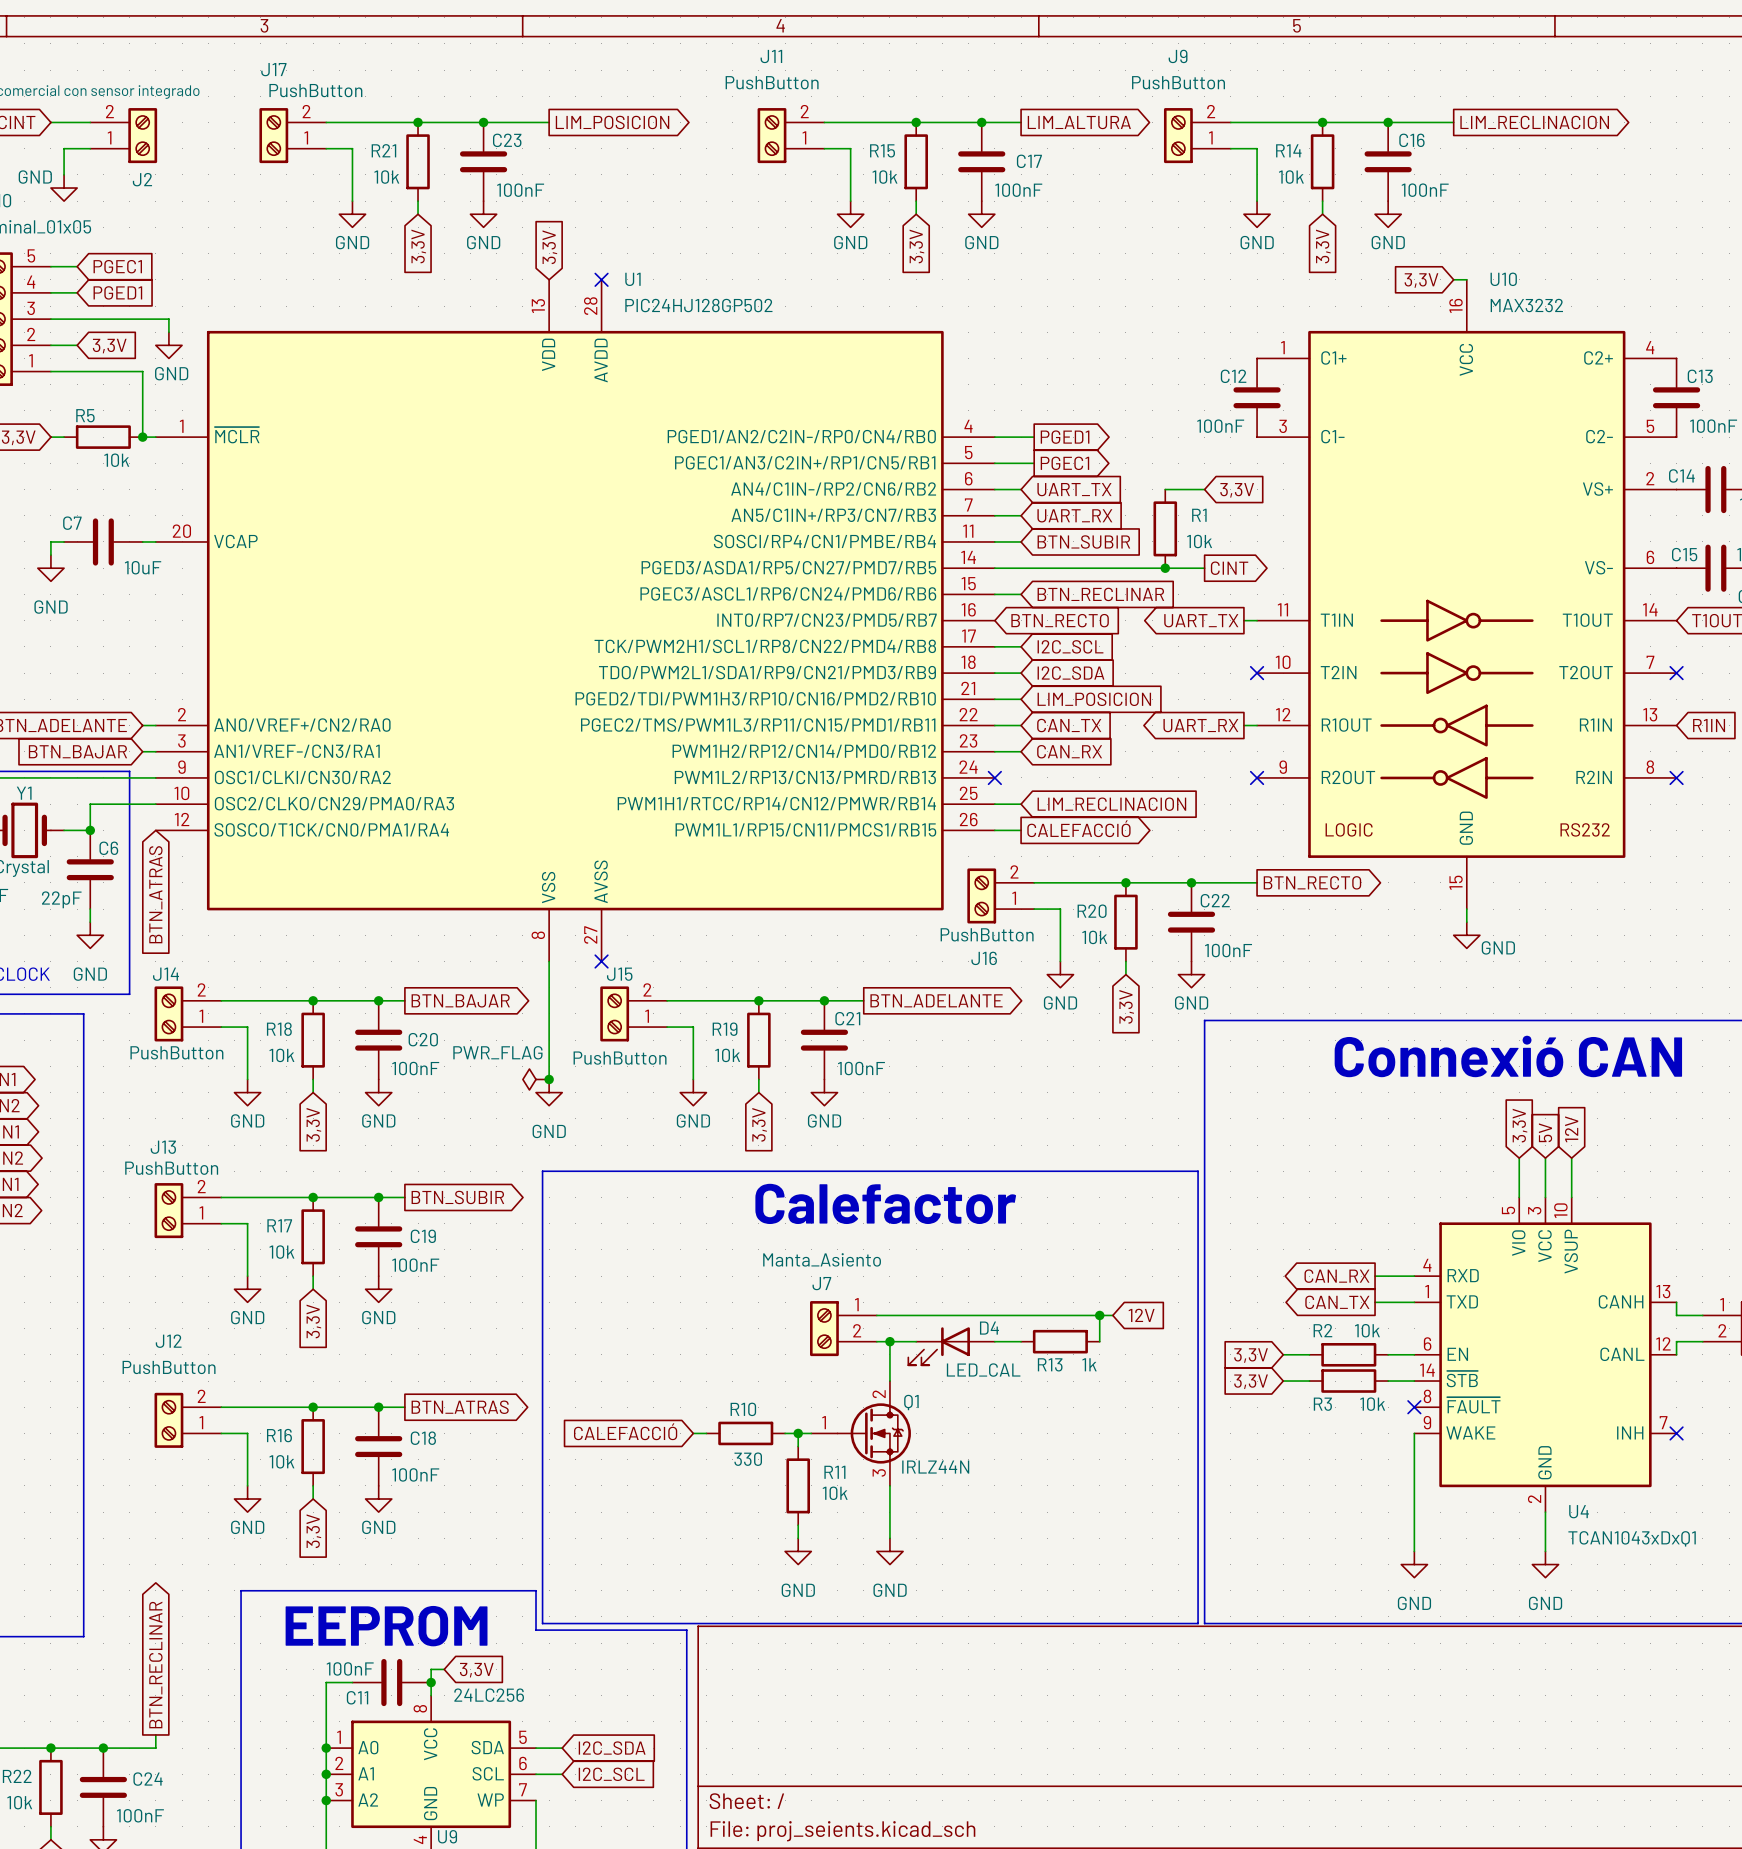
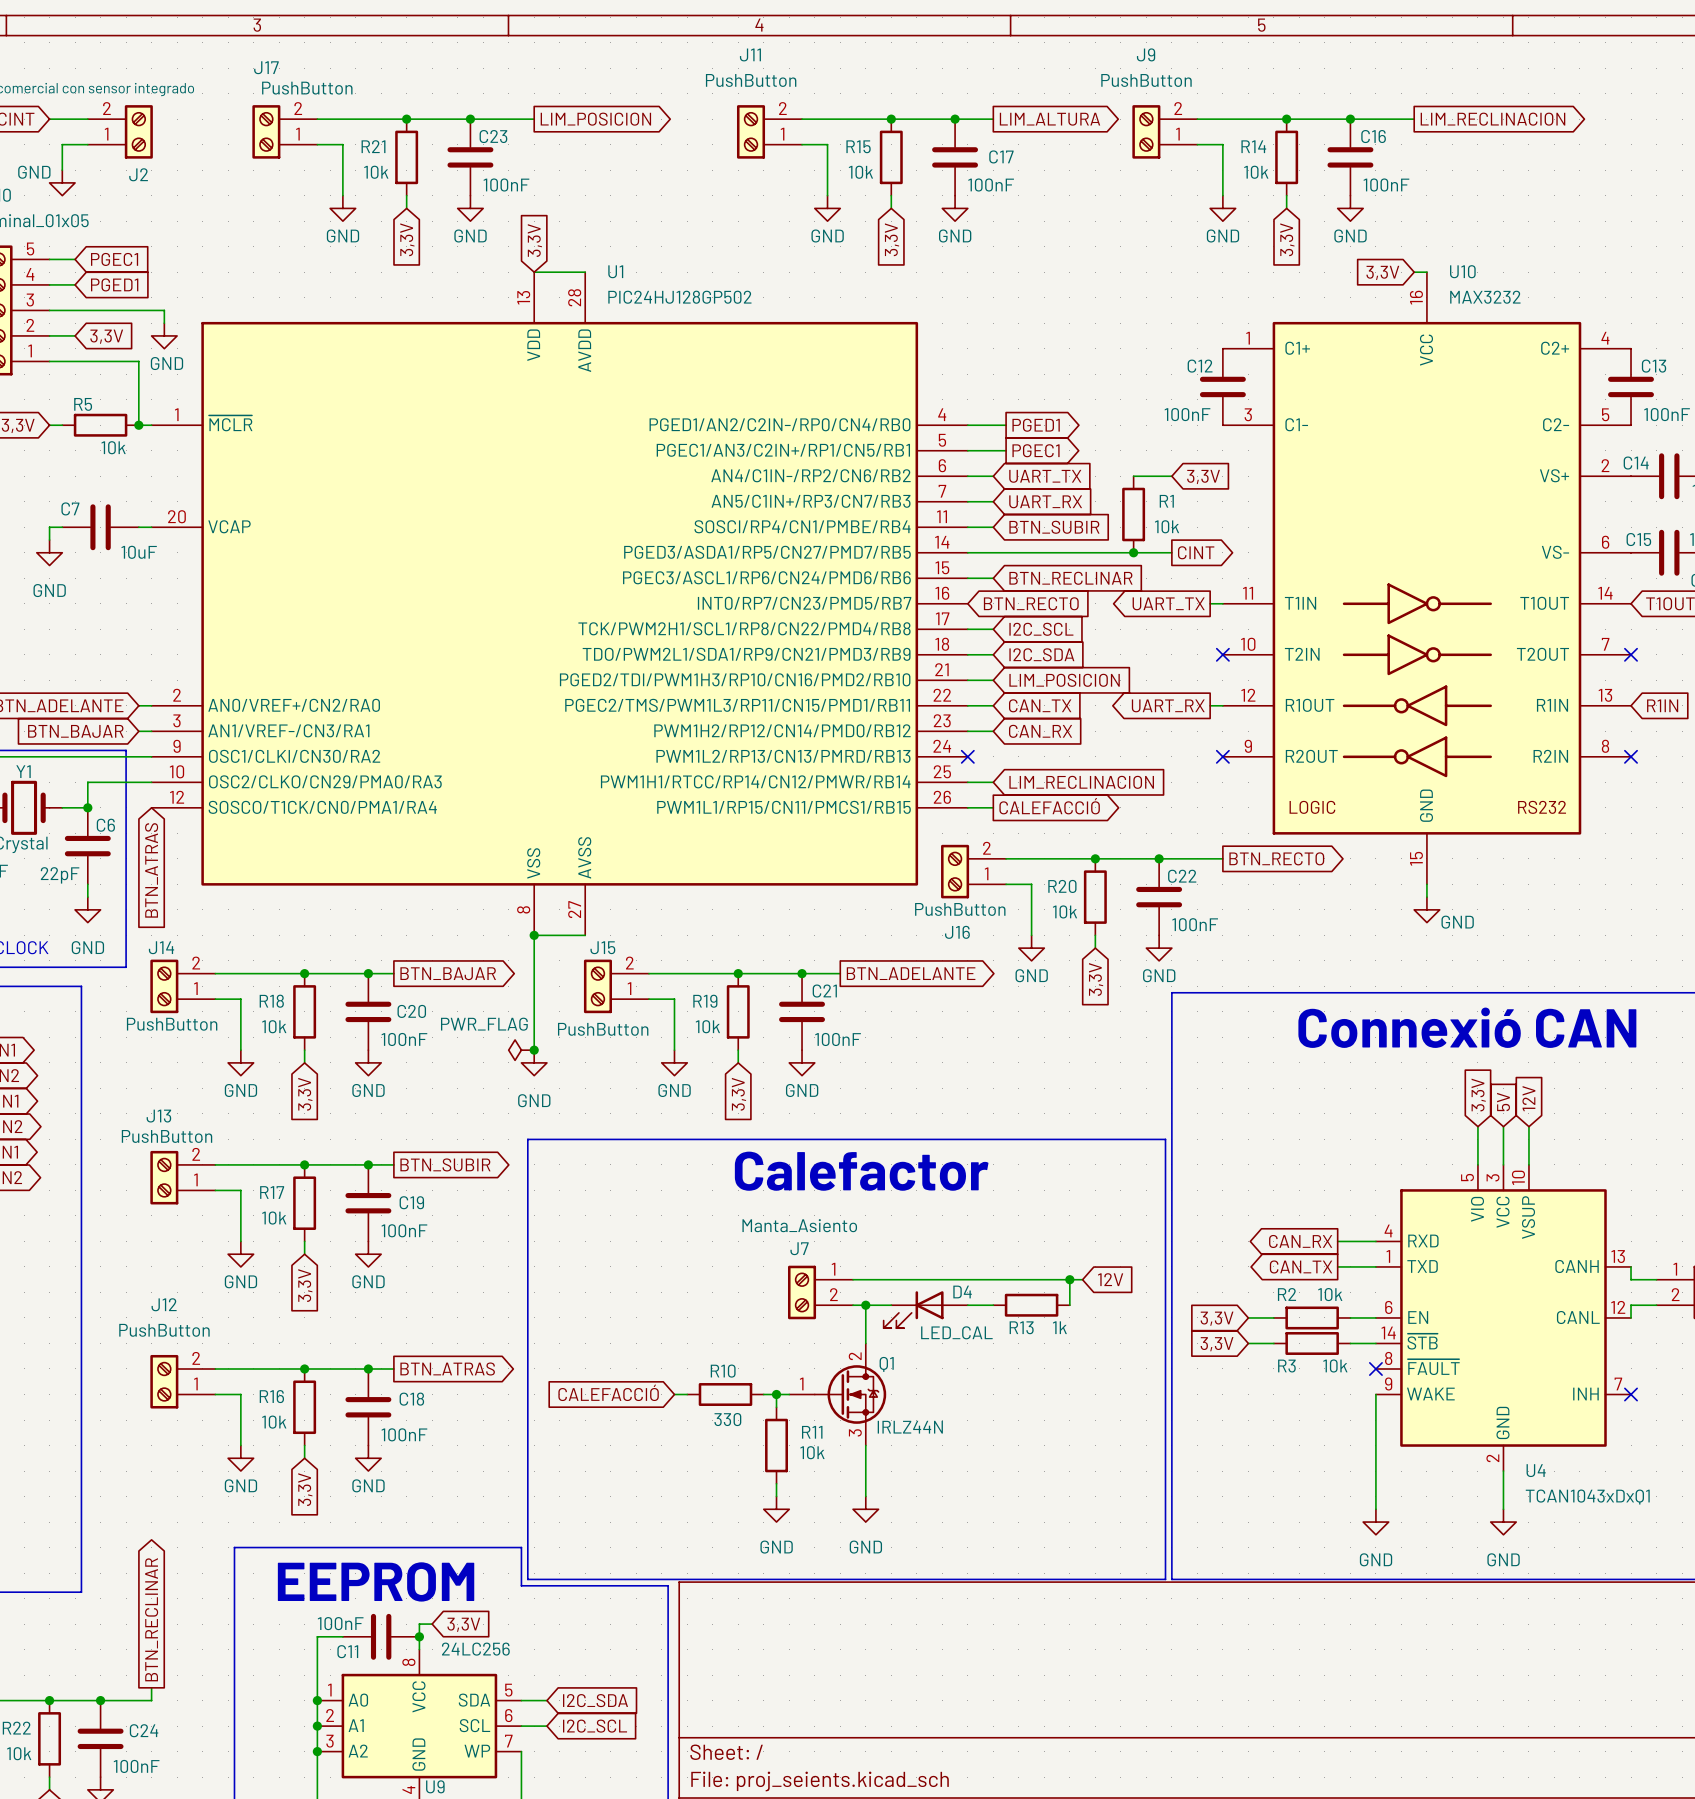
wire: none -> (534, 272) (585, 272)
no-connect mark: (601, 279) -> none
wire: none -> (534, 935) (585, 935)
junction: none -> (534, 935)
no-connect mark: (601, 961) -> none

